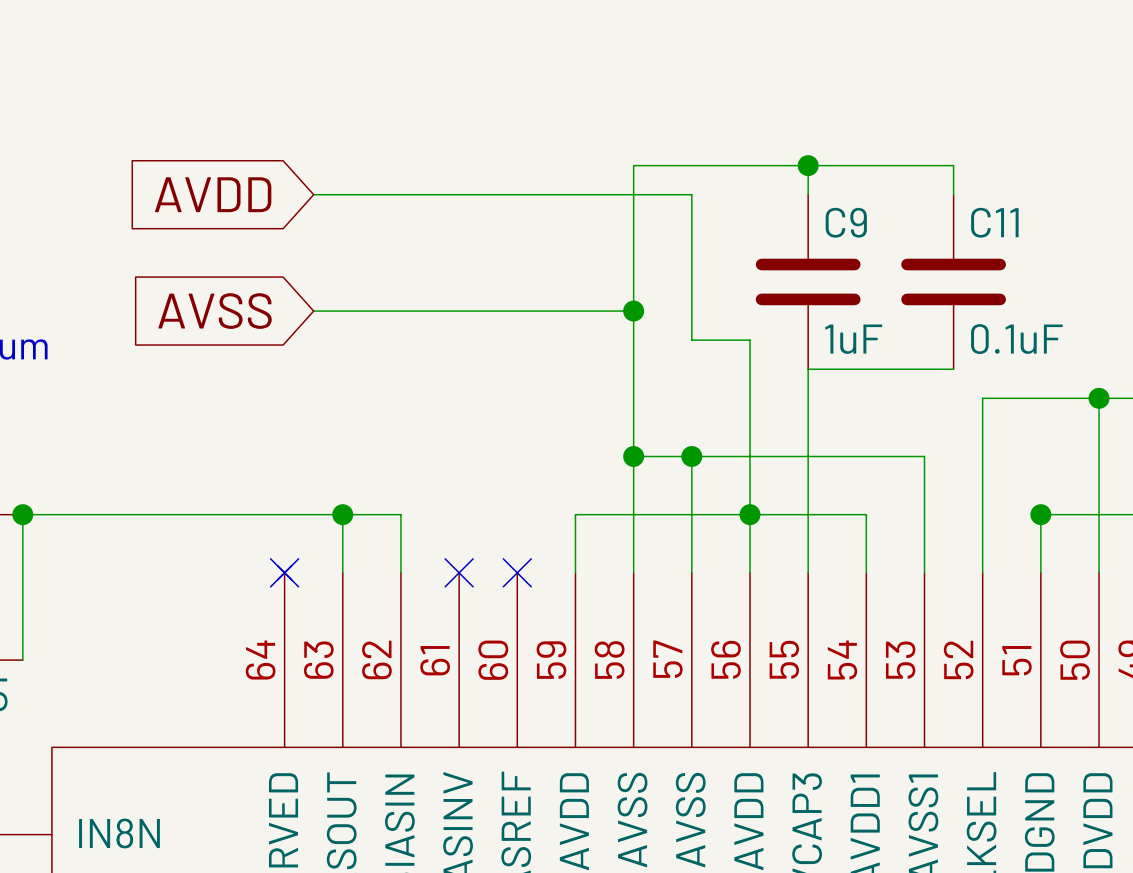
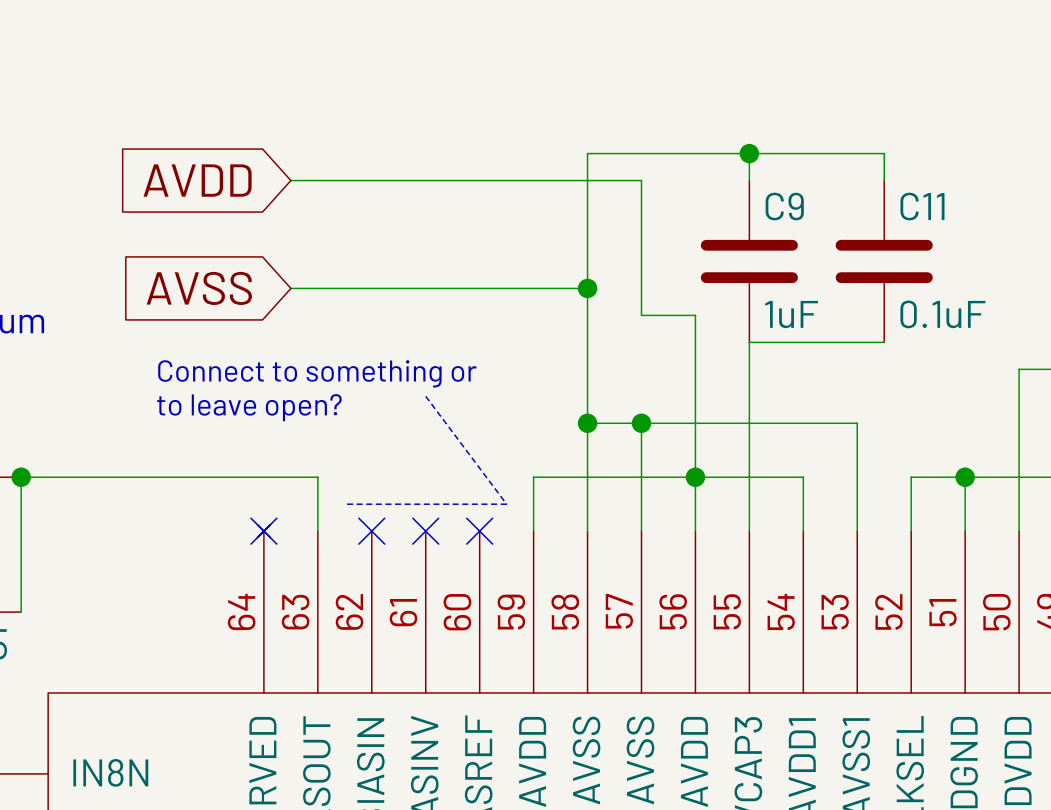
wire: (1099, 398) (982, 398) (982, 514) -> (965, 477) (911, 477)
junction: (1099, 398) -> none
text: none -> Connect to something or (317, 373)
line: none -> (425, 396) (506, 504) (344, 504)
text: none -> to leave open? (249, 407)
wire: (342, 514) (400, 514) (400, 572) -> none
junction: (342, 514) -> none
no-connect mark: none -> (371, 531)

